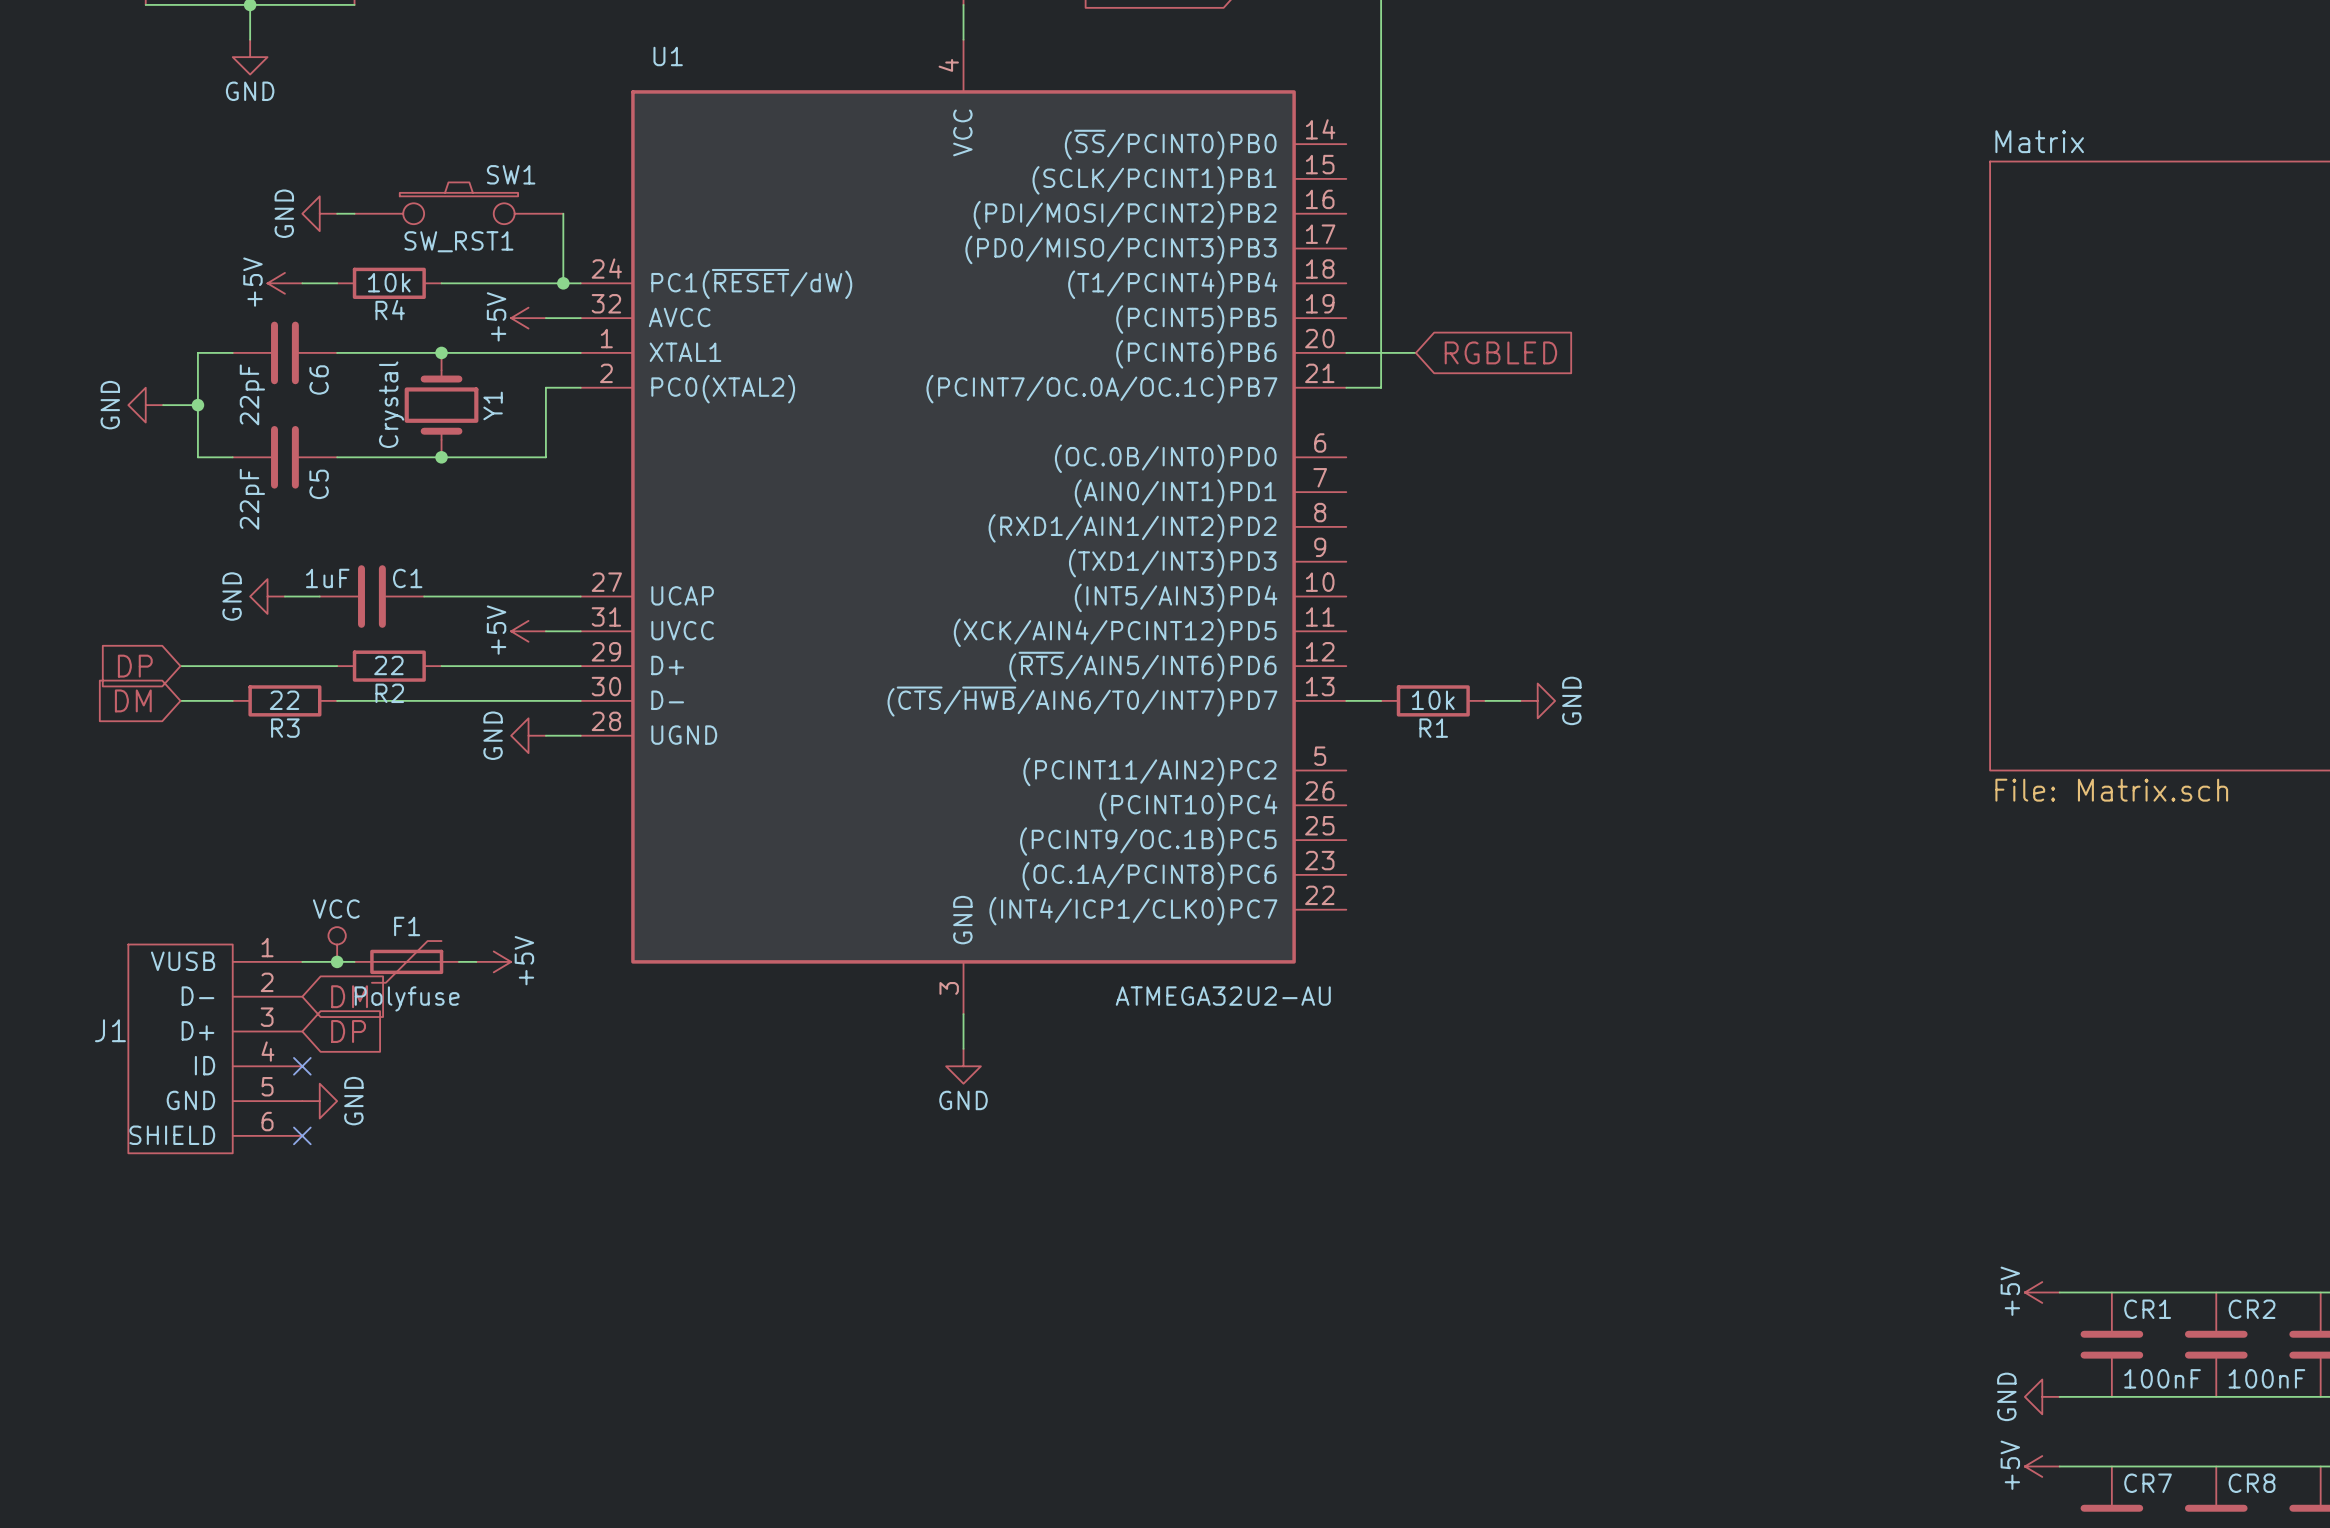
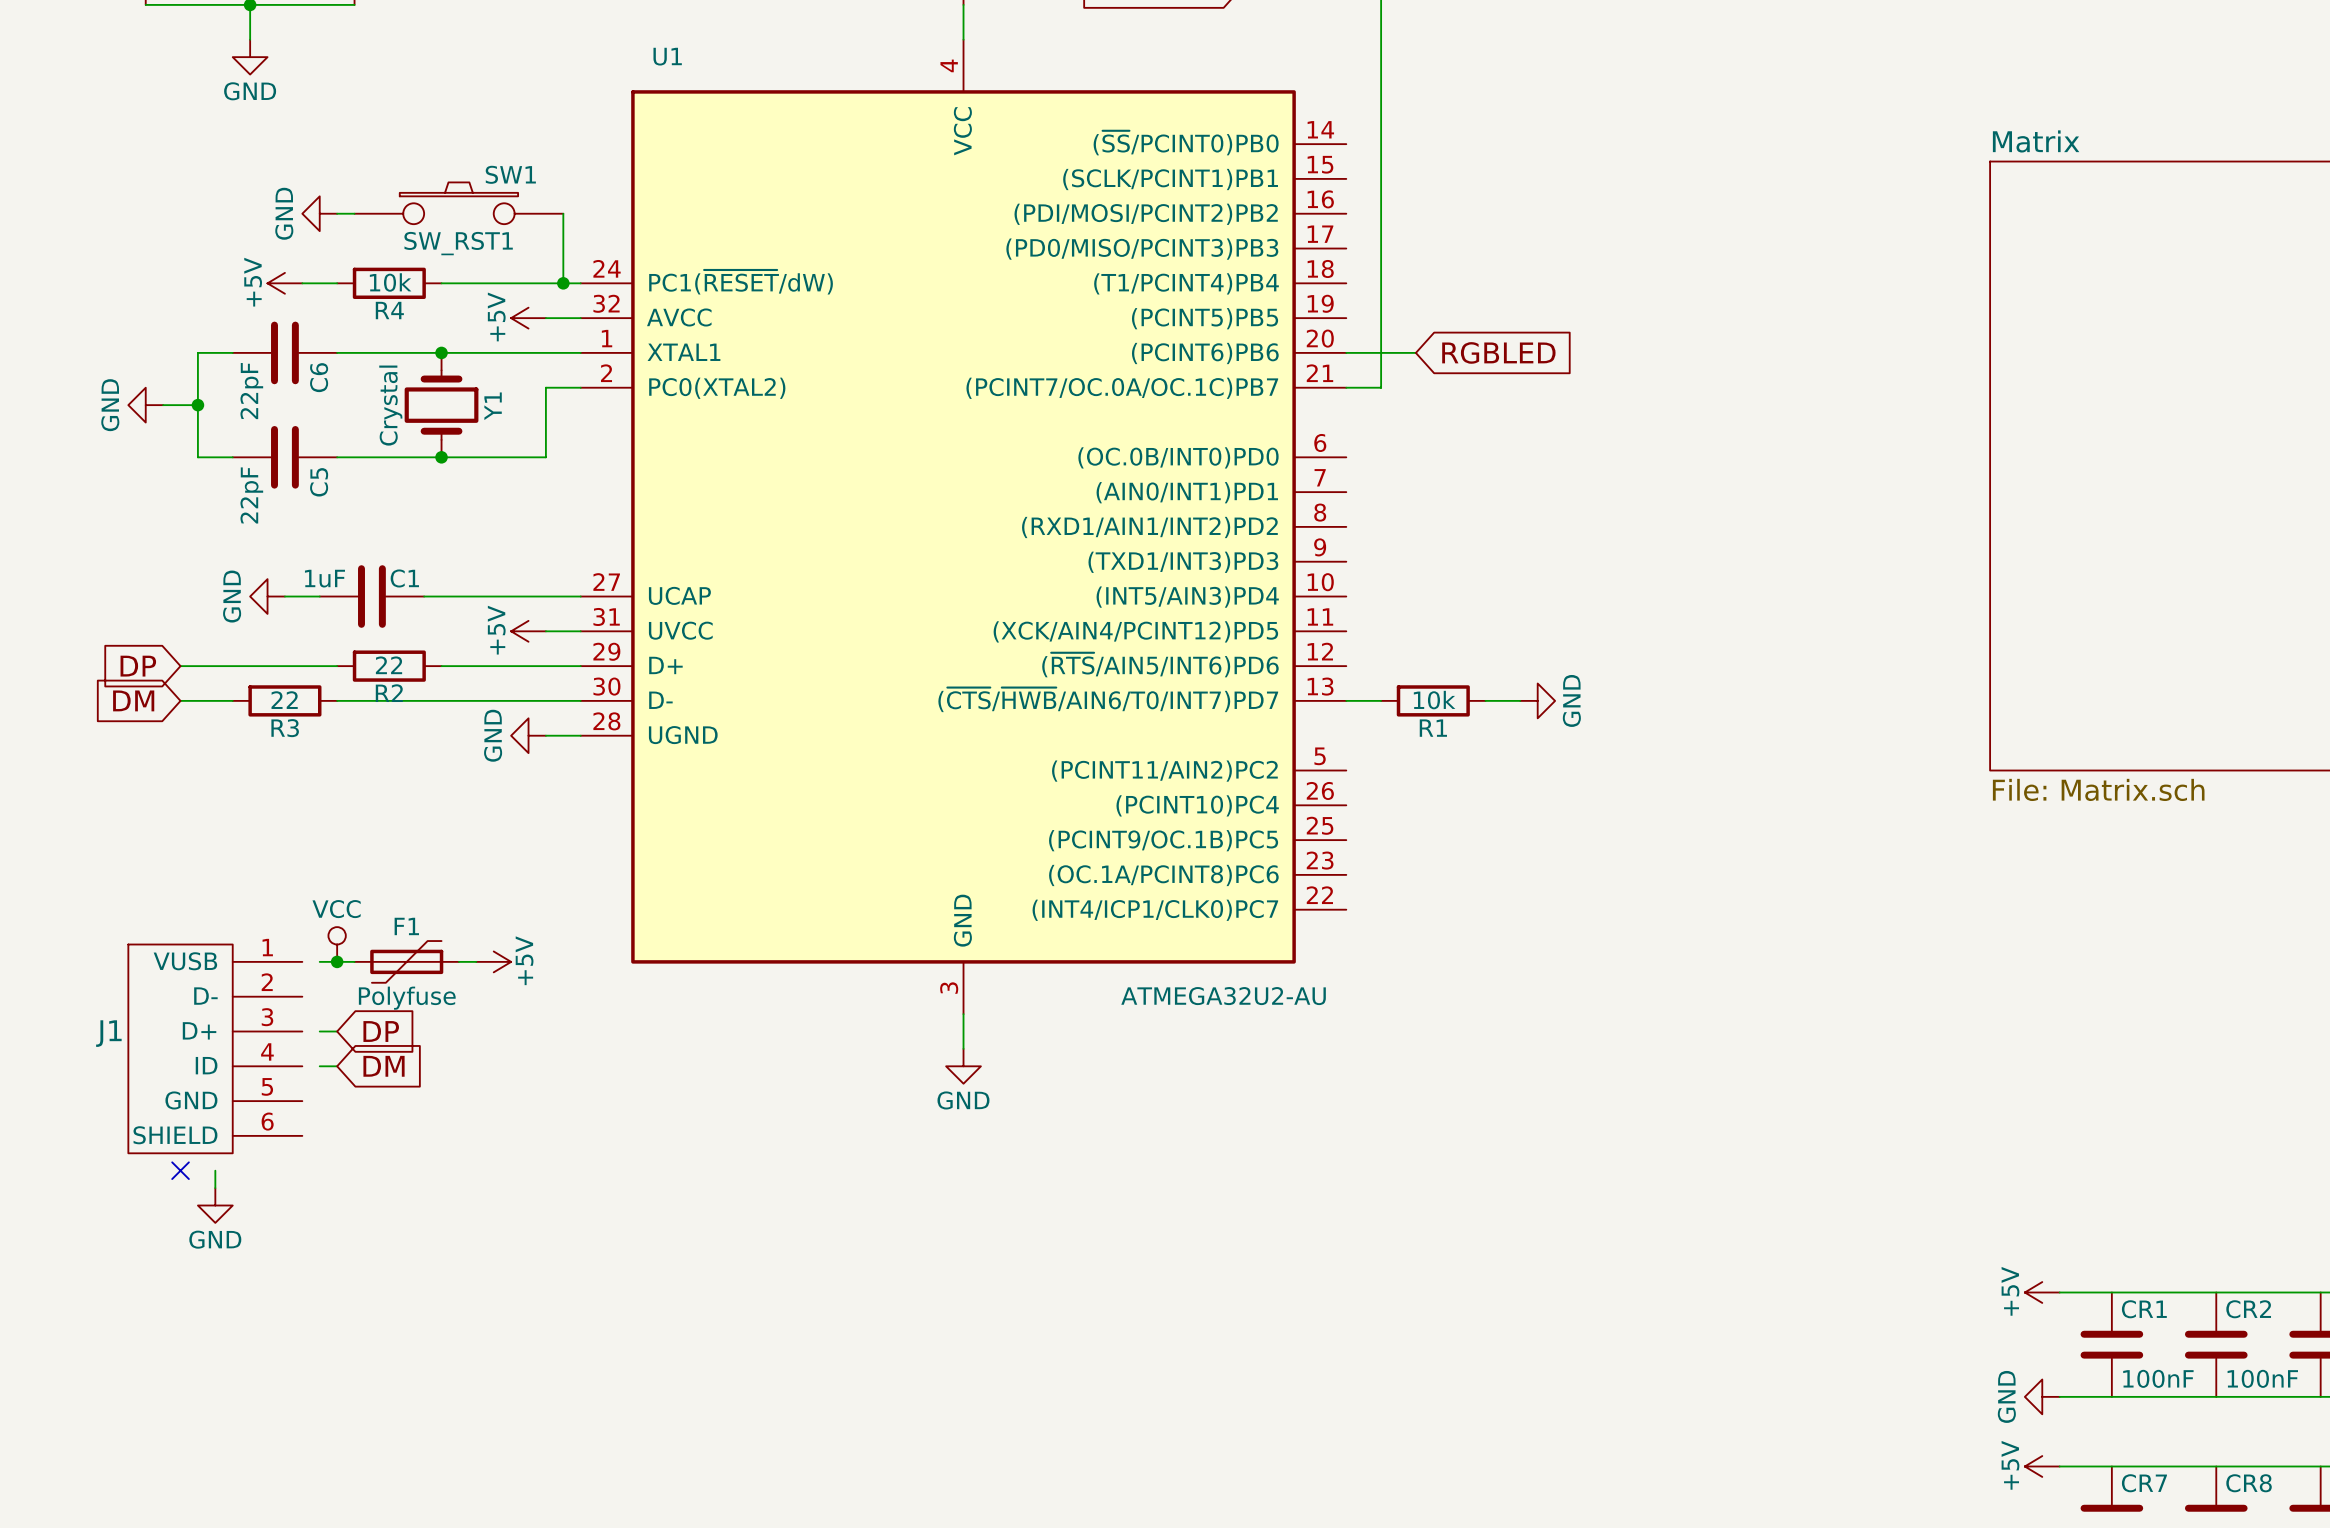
wire: (302, 961) (319, 961) -> (319, 1031) (337, 1031)
global label position: DM (349, 996) -> DM (384, 1066)
global label position: DP (348, 1031) -> DP (381, 1031)
no-connect mark: (302, 1066) -> none
wire: none -> (319, 1066) (337, 1066)
power symbol rotation: 0° (319, 1101) -> 90° clockwise (215, 1205)
power symbol position: GND (319, 1101) -> GND (215, 1205)
no-connect mark: (302, 1135) -> none
no-connect mark: none -> (180, 1170)
wire: none -> (215, 1170) (215, 1188)

